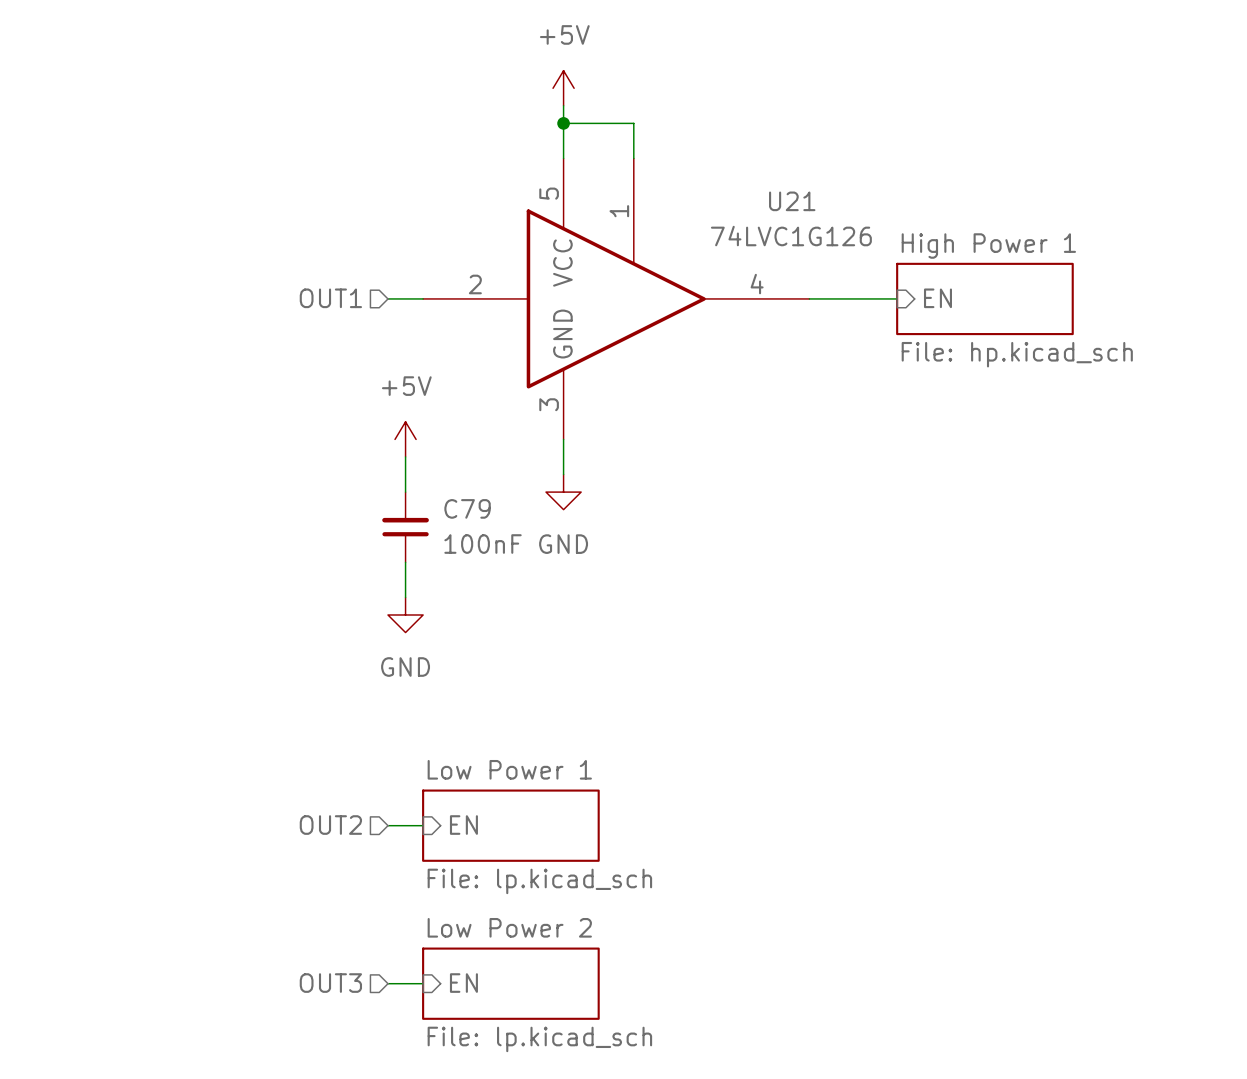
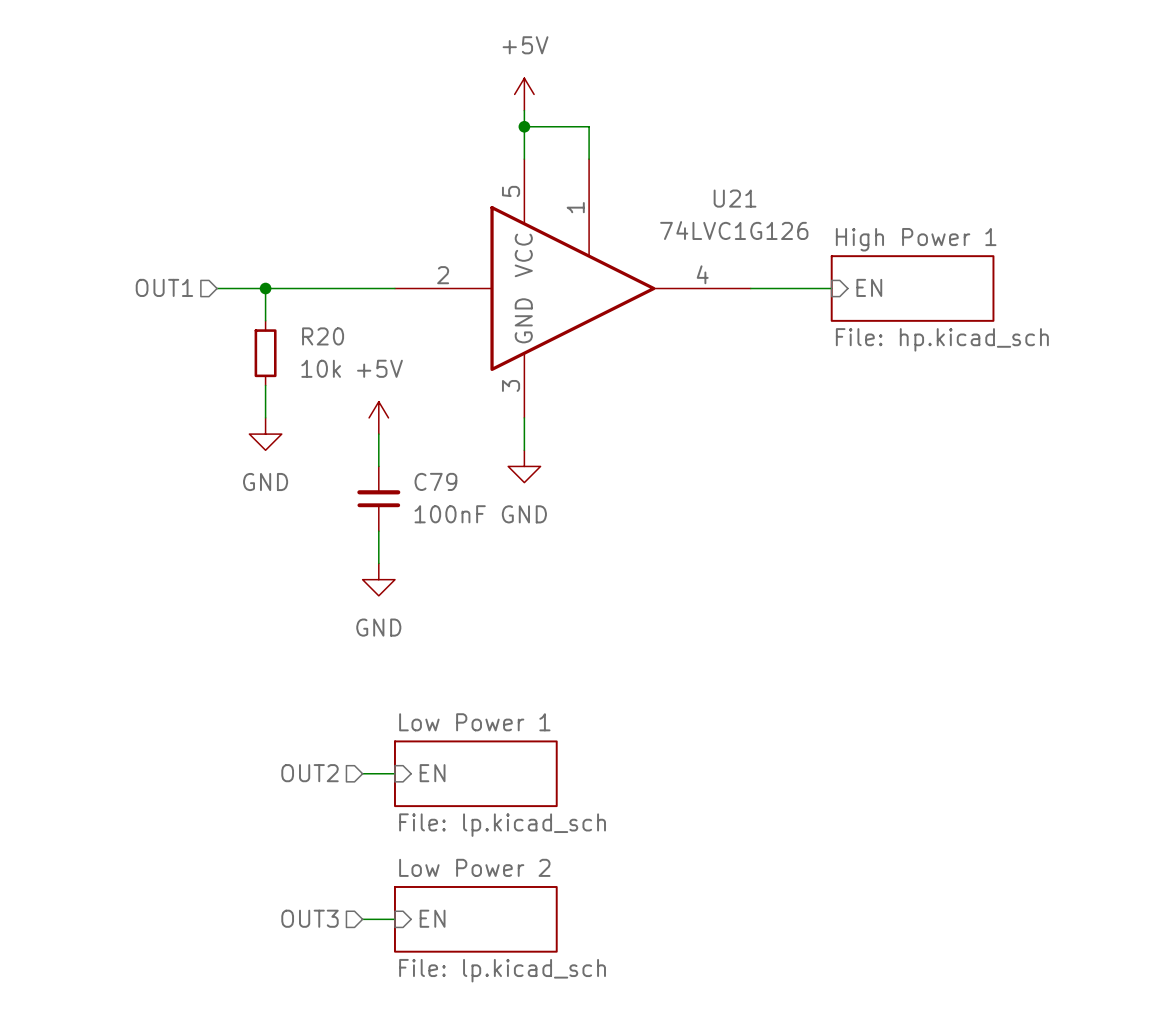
wire: none -> (217, 288) (362, 288)
wire: none -> (265, 288) (265, 320)
junction: none -> (265, 288)
hierarchical label position: OUT1 (330, 298) -> OUT1 (164, 287)
R20: none -> 10k (265, 353)
wire: none -> (265, 385) (265, 417)
power symbol: none -> GND (265, 434)

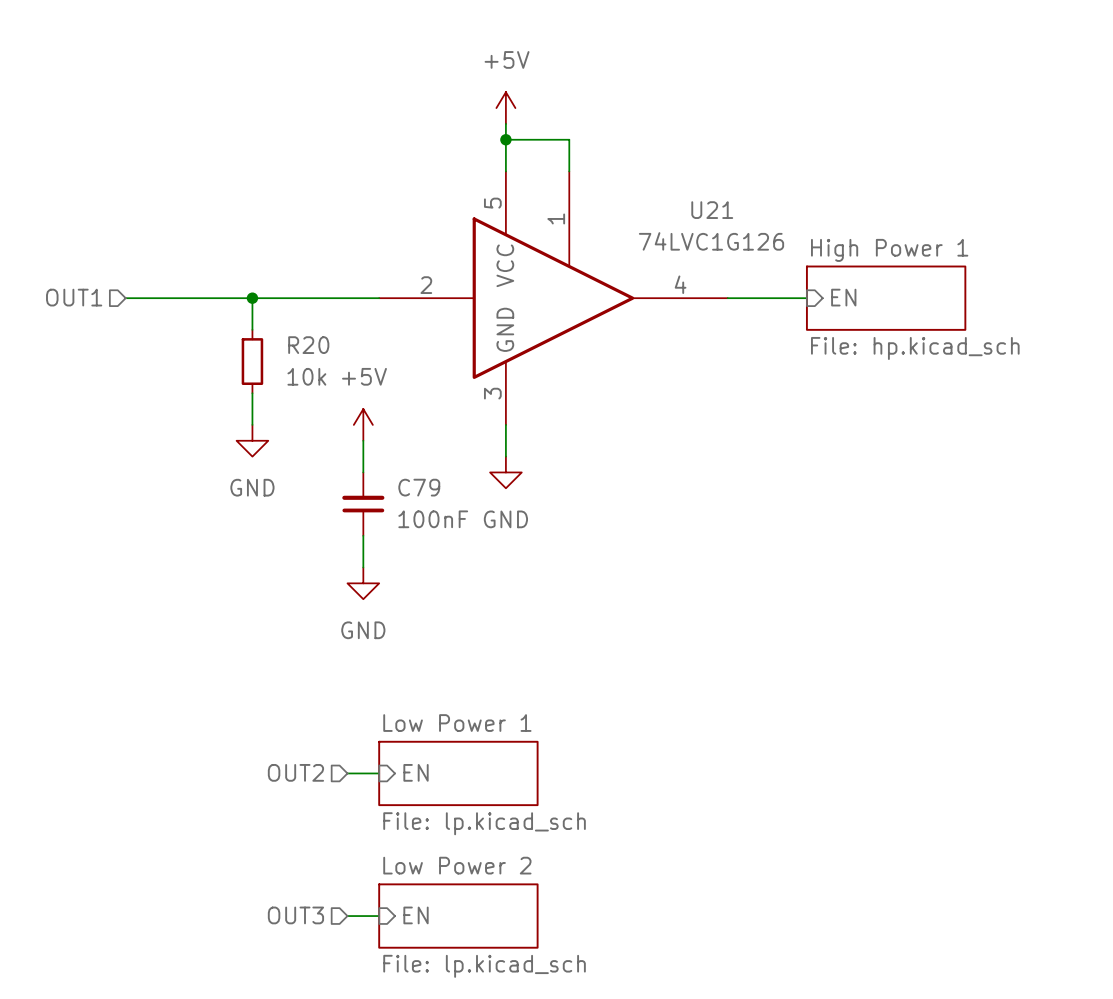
hierarchical label position: OUT1 (164, 287) -> OUT1 (74, 297)
wire: none -> (125, 298) (204, 298)

